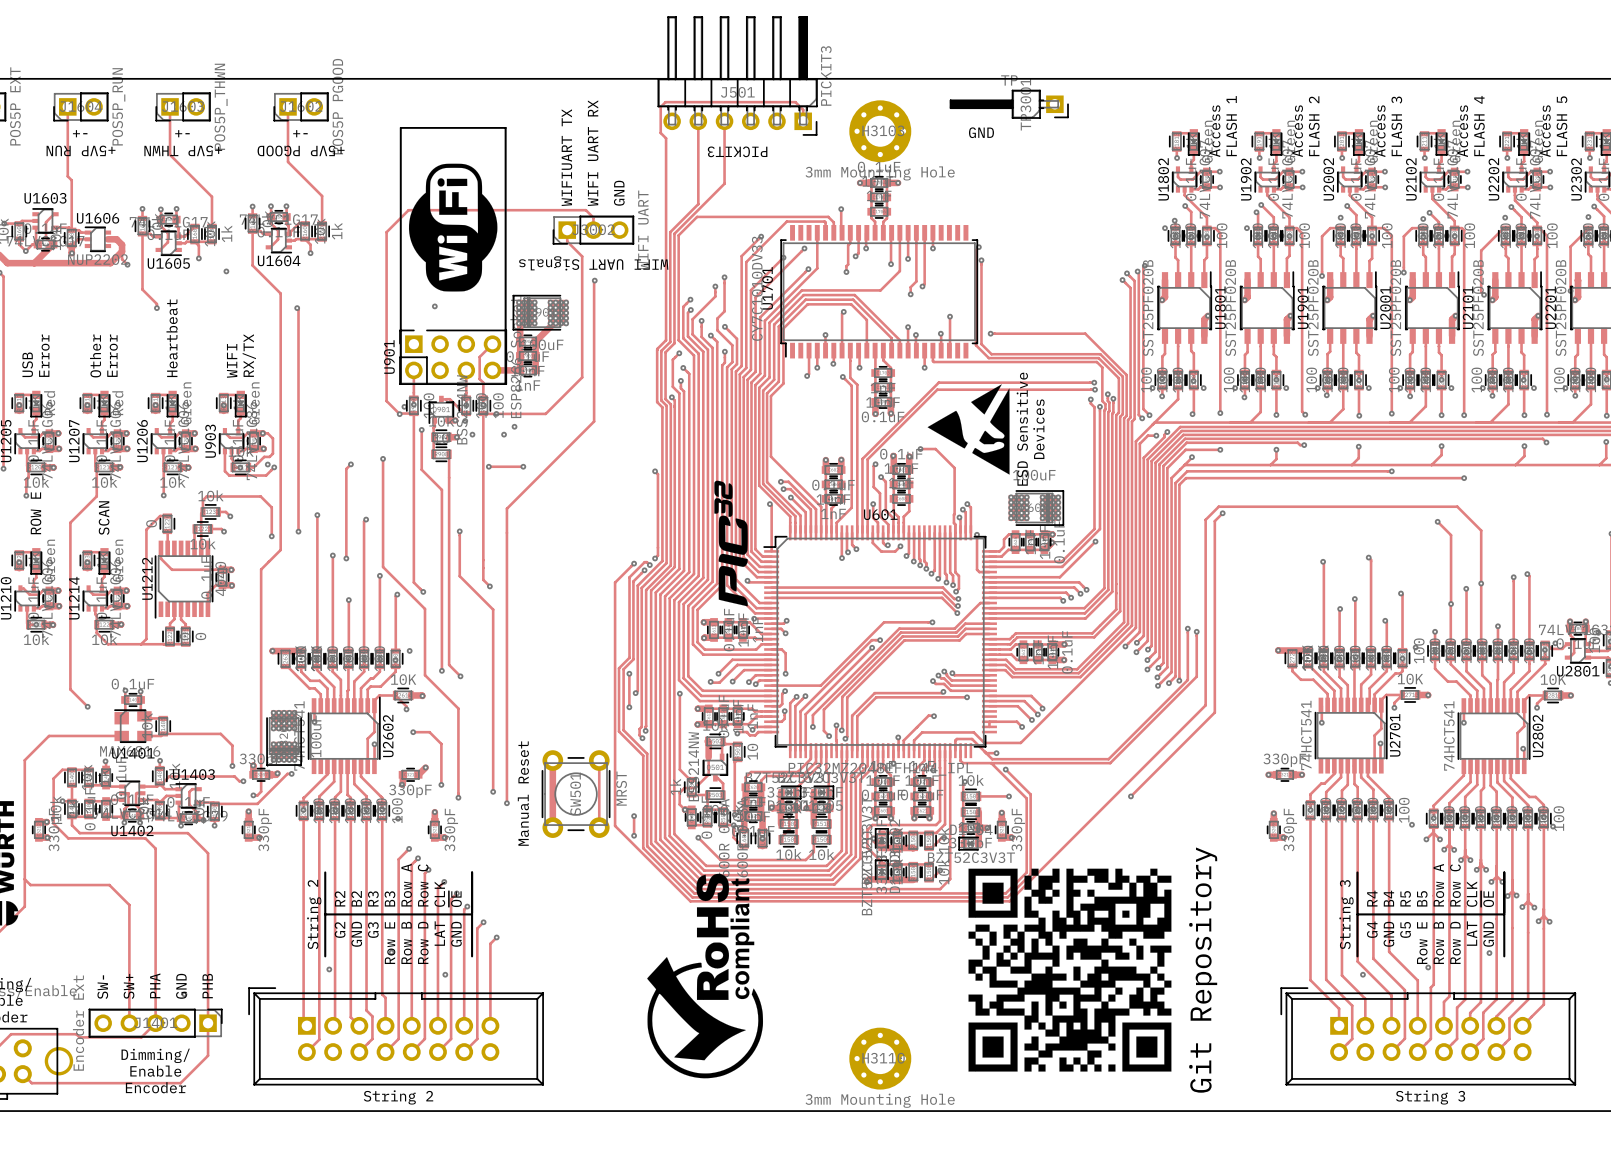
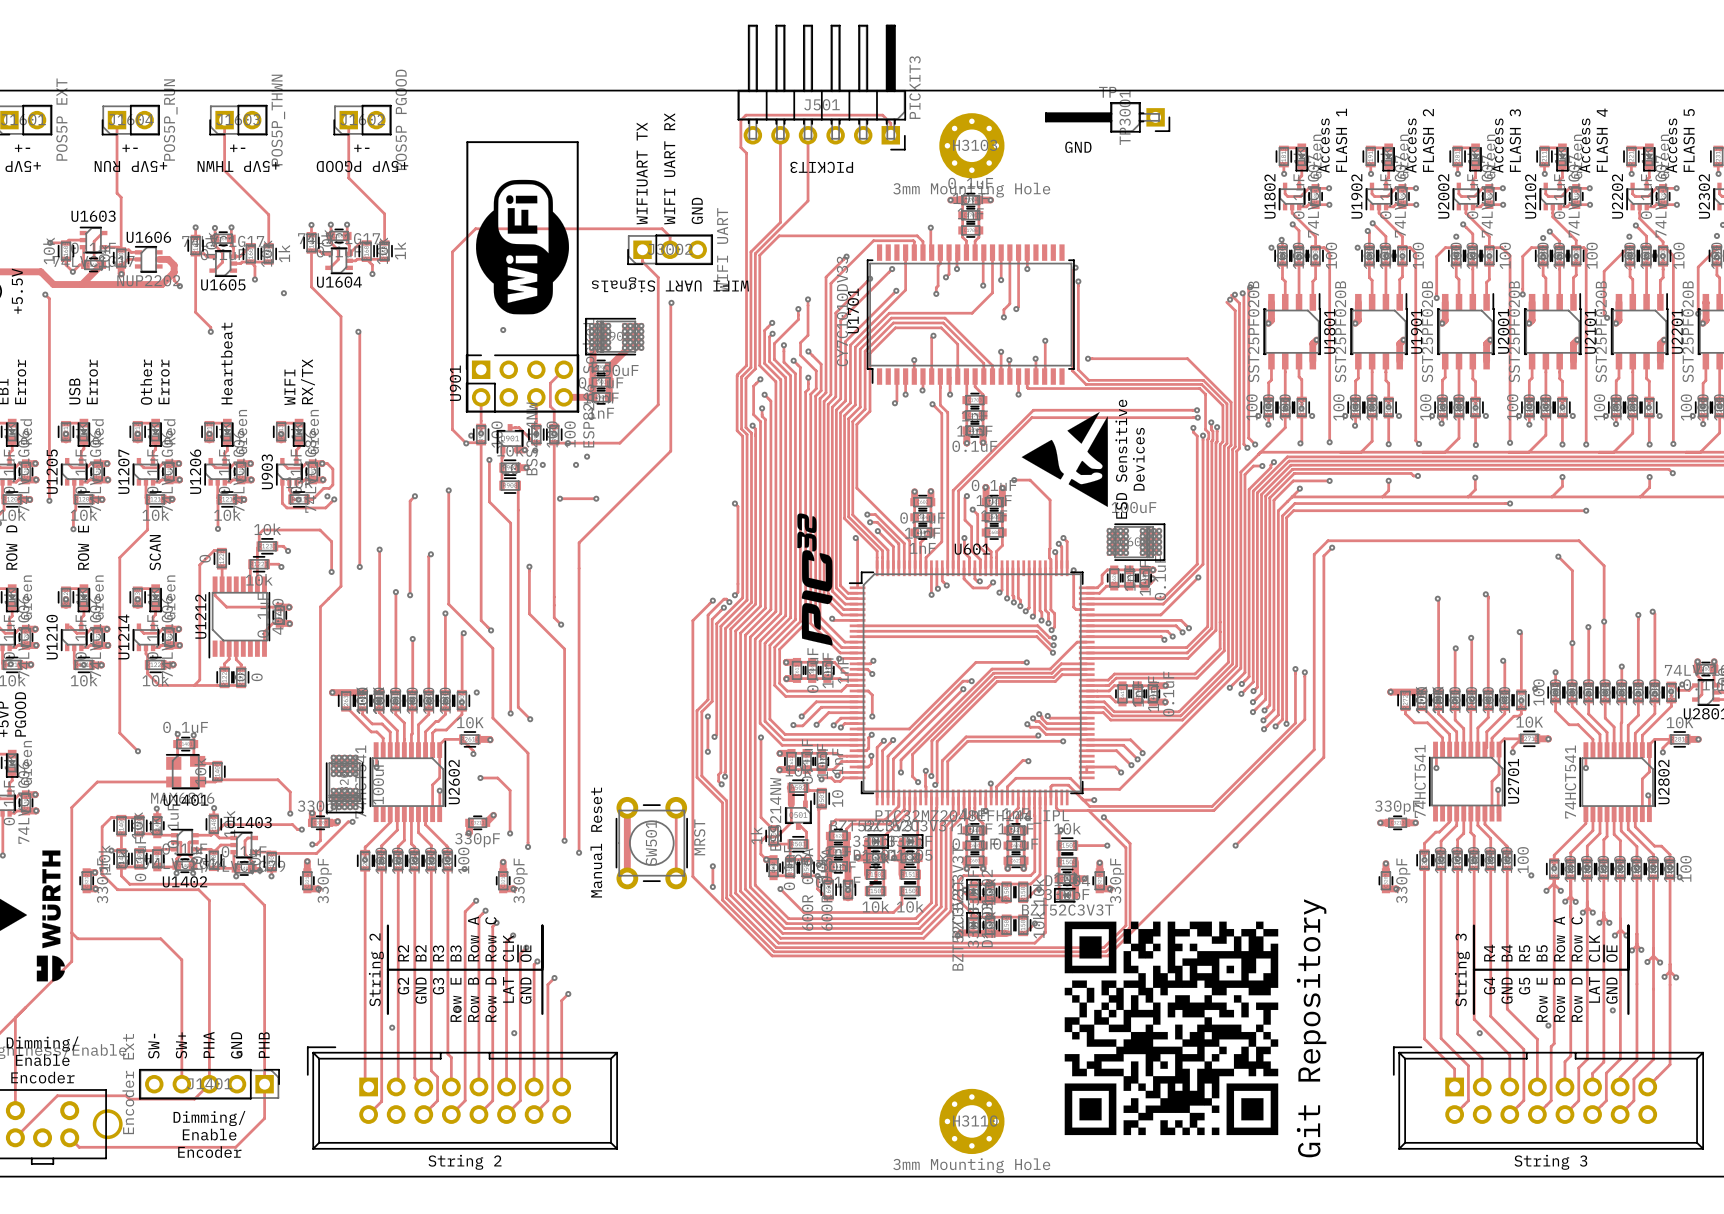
via: none -> (1234, 294)
via: (1126, 273) -> none
via: none -> (1230, 299)
via: (1122, 280) -> none
drawing: [647, 873, 764, 1079] -> none

